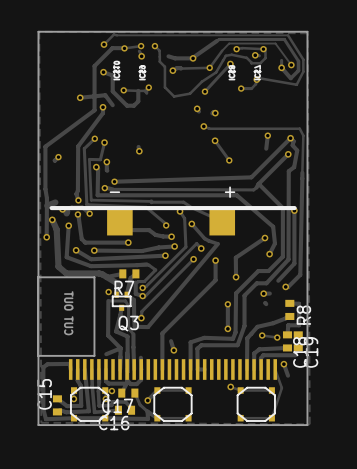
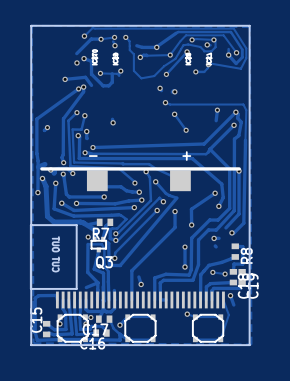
track: (94, 66) (94, 110) (45, 146) -> (78, 88) (36, 119)
via: none -> (76, 62)
via: none -> (78, 88)

